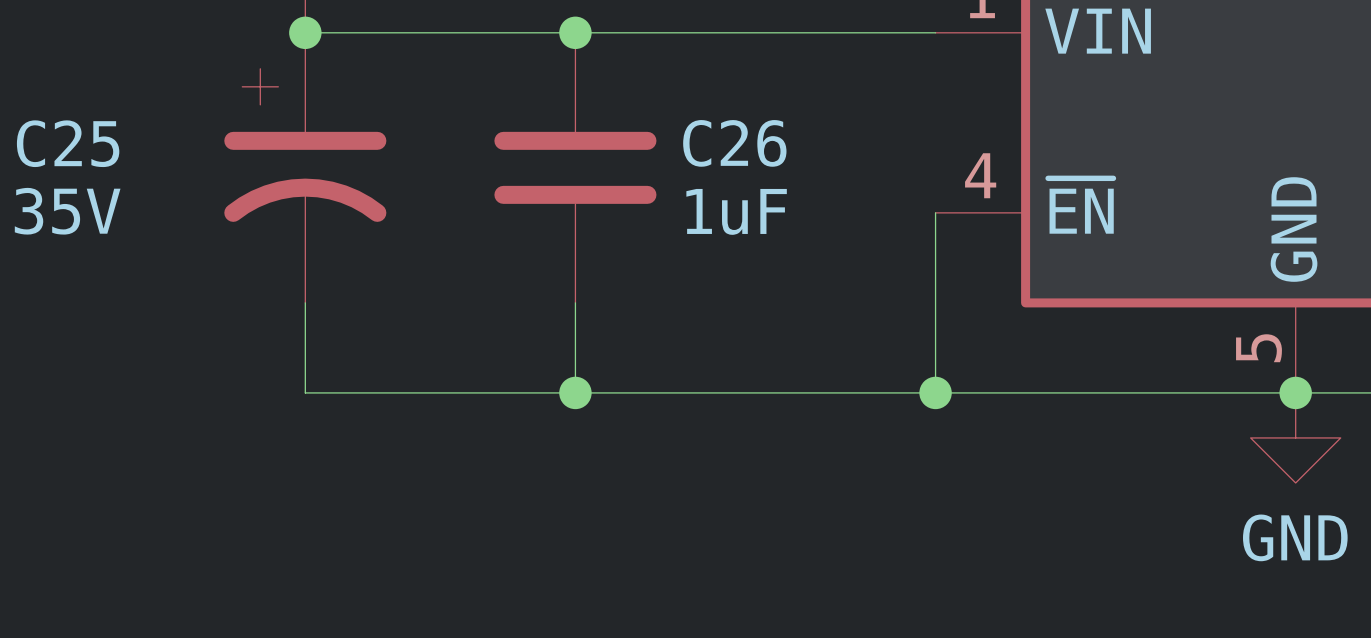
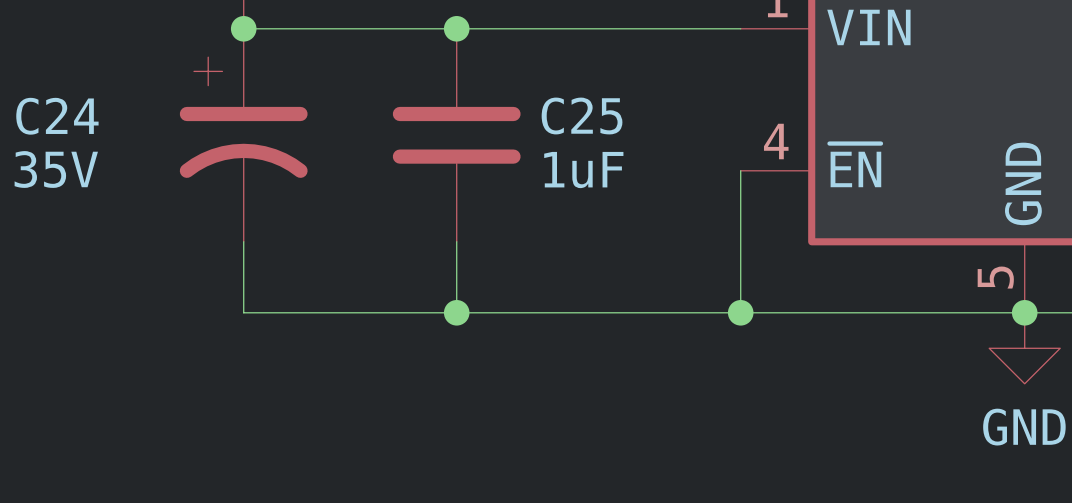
C25 name: C25 (68, 143) -> C24 (57, 116)
C26 name: C26 (734, 143) -> C25 (582, 116)

